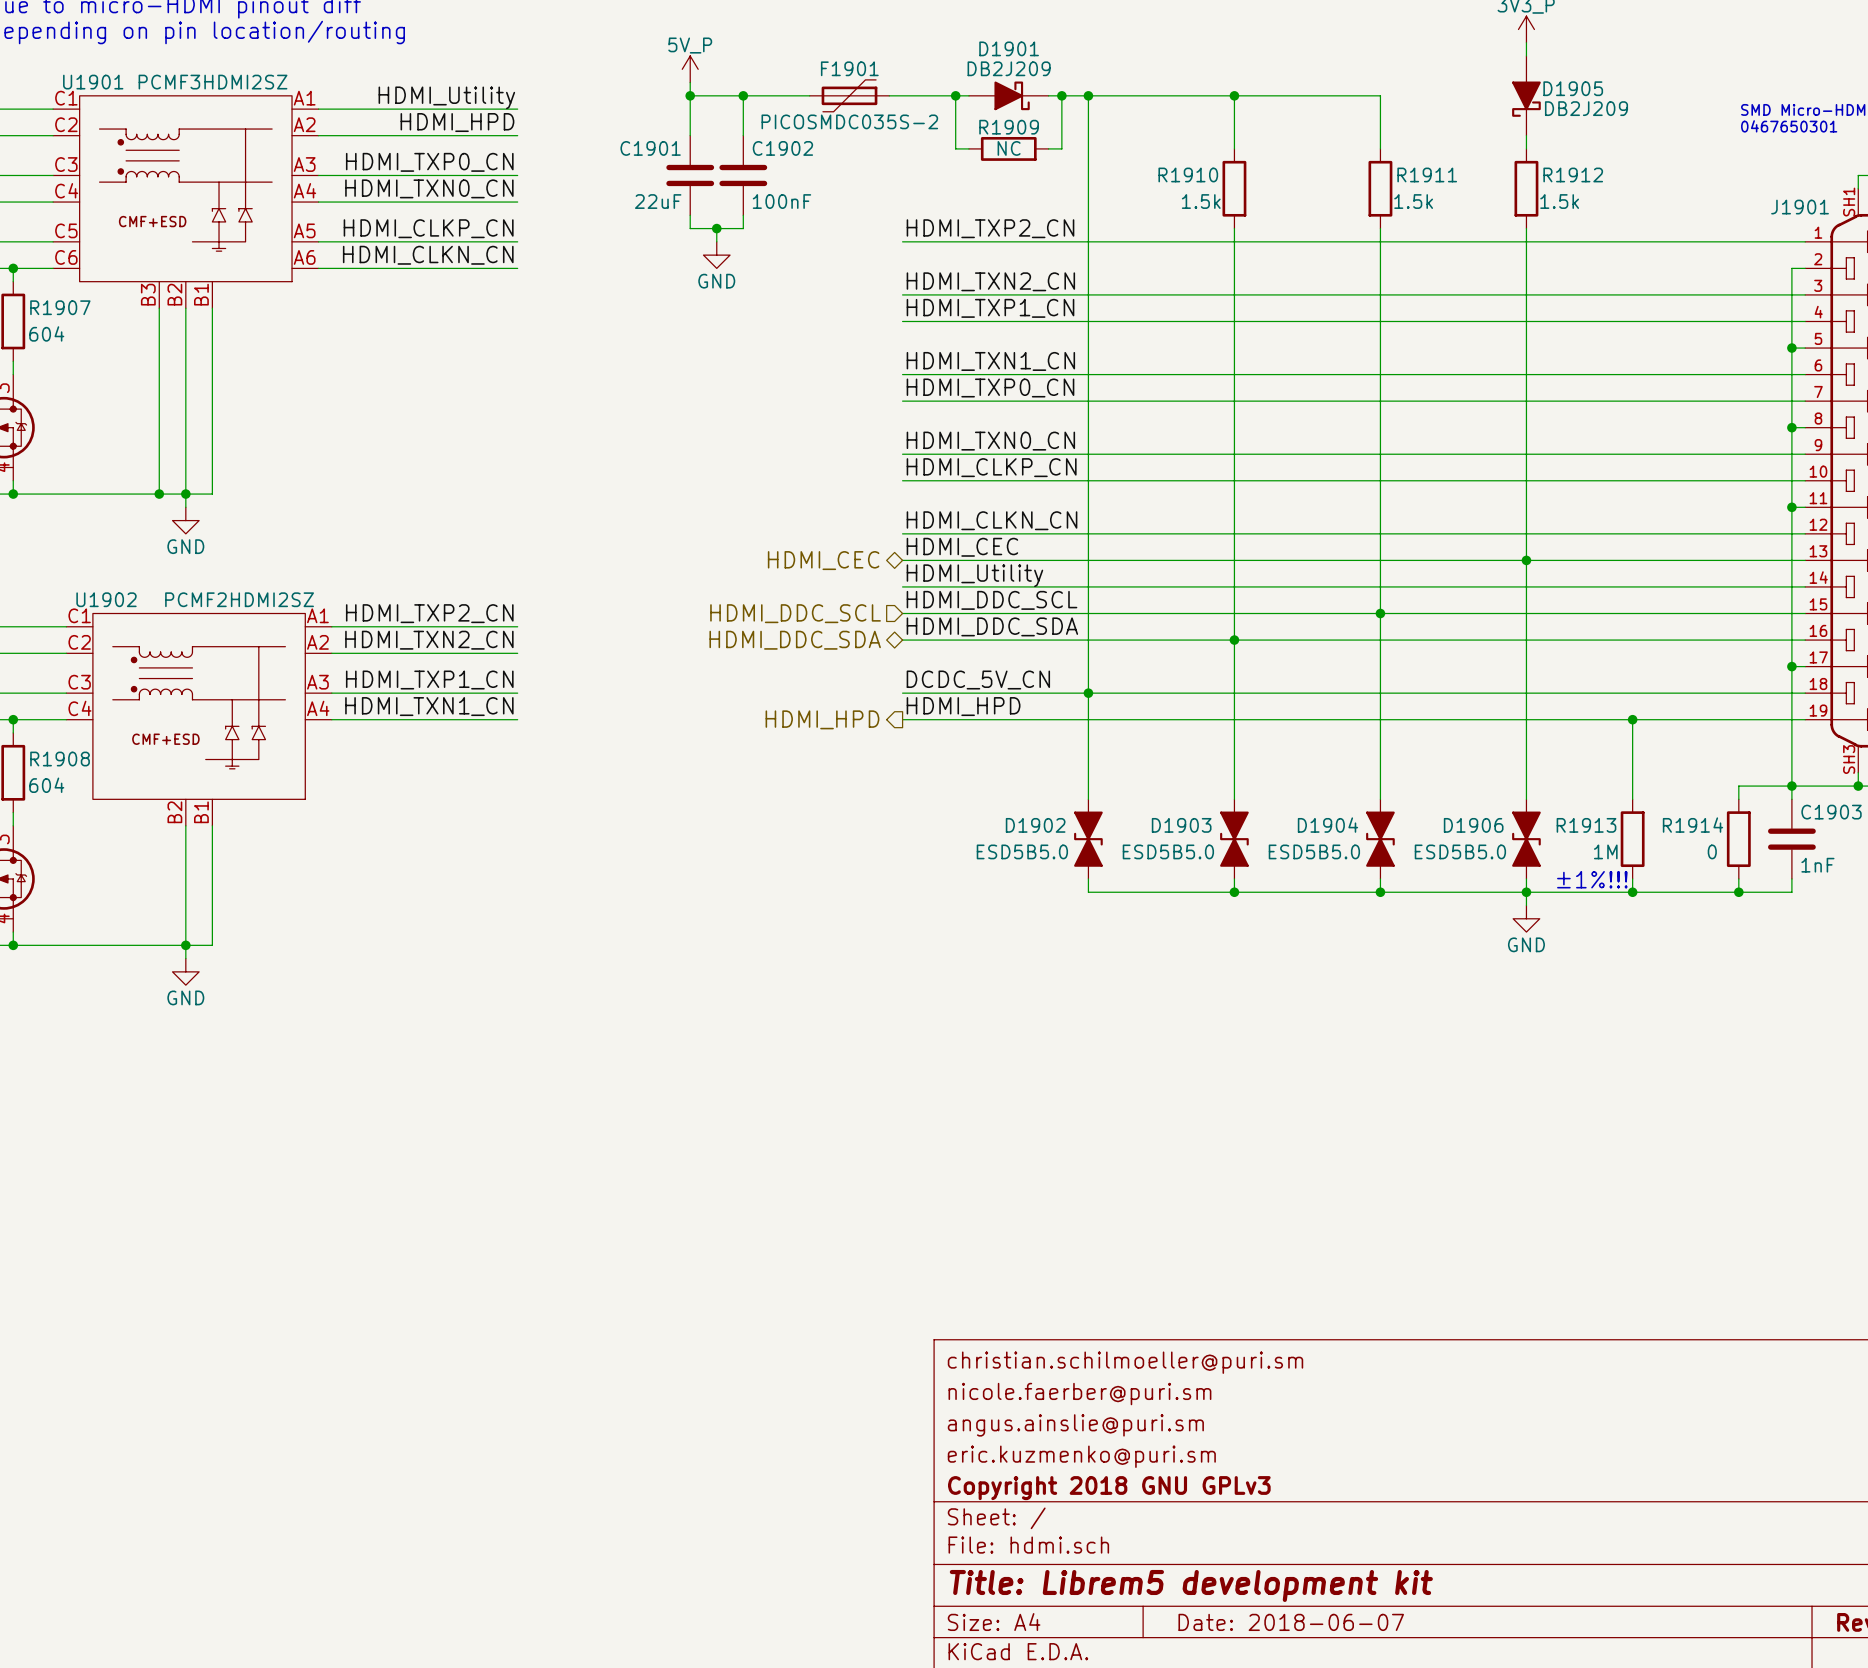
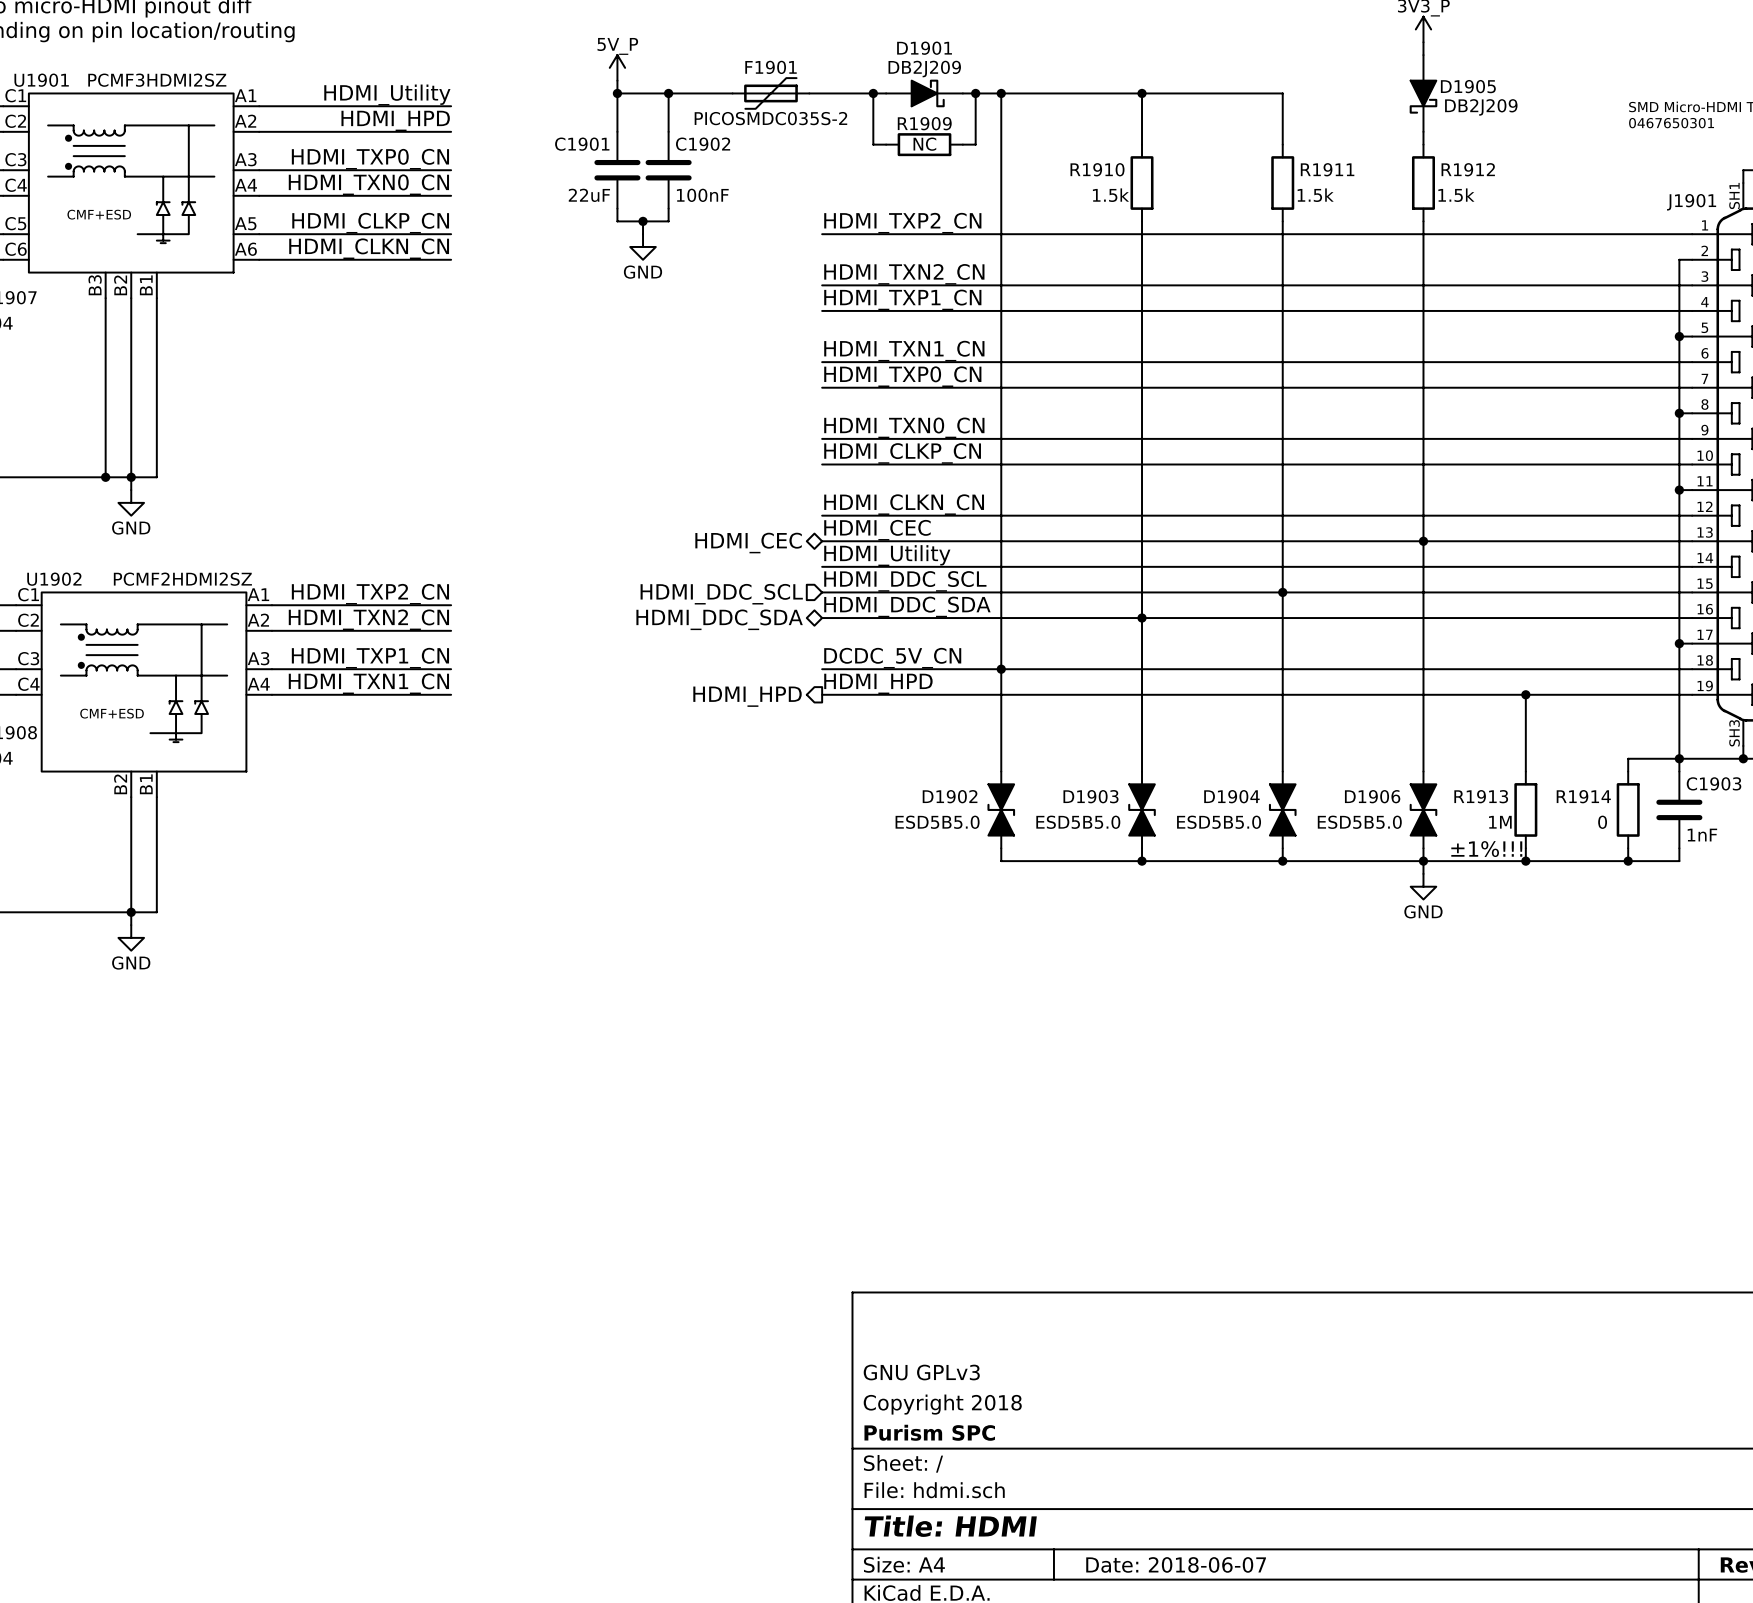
title block: christian.schilmoeller@puri.sm (1125, 1362) -> none
title block: nicole.faerber@puri.sm (1079, 1394) -> none
title block: angus.ainslie@puri.sm (1075, 1425) -> GNU GPLv3 (921, 1372)
title block: eric.kuzmenko@puri.sm (1081, 1456) -> Copyright 2018 (942, 1404)
title block: Copyright 2018 GNU GPLv3 (1109, 1488) -> Purism SPC (929, 1432)
title block: Title: Librem5 development kit (1191, 1585) -> Title: HDMI (950, 1526)

